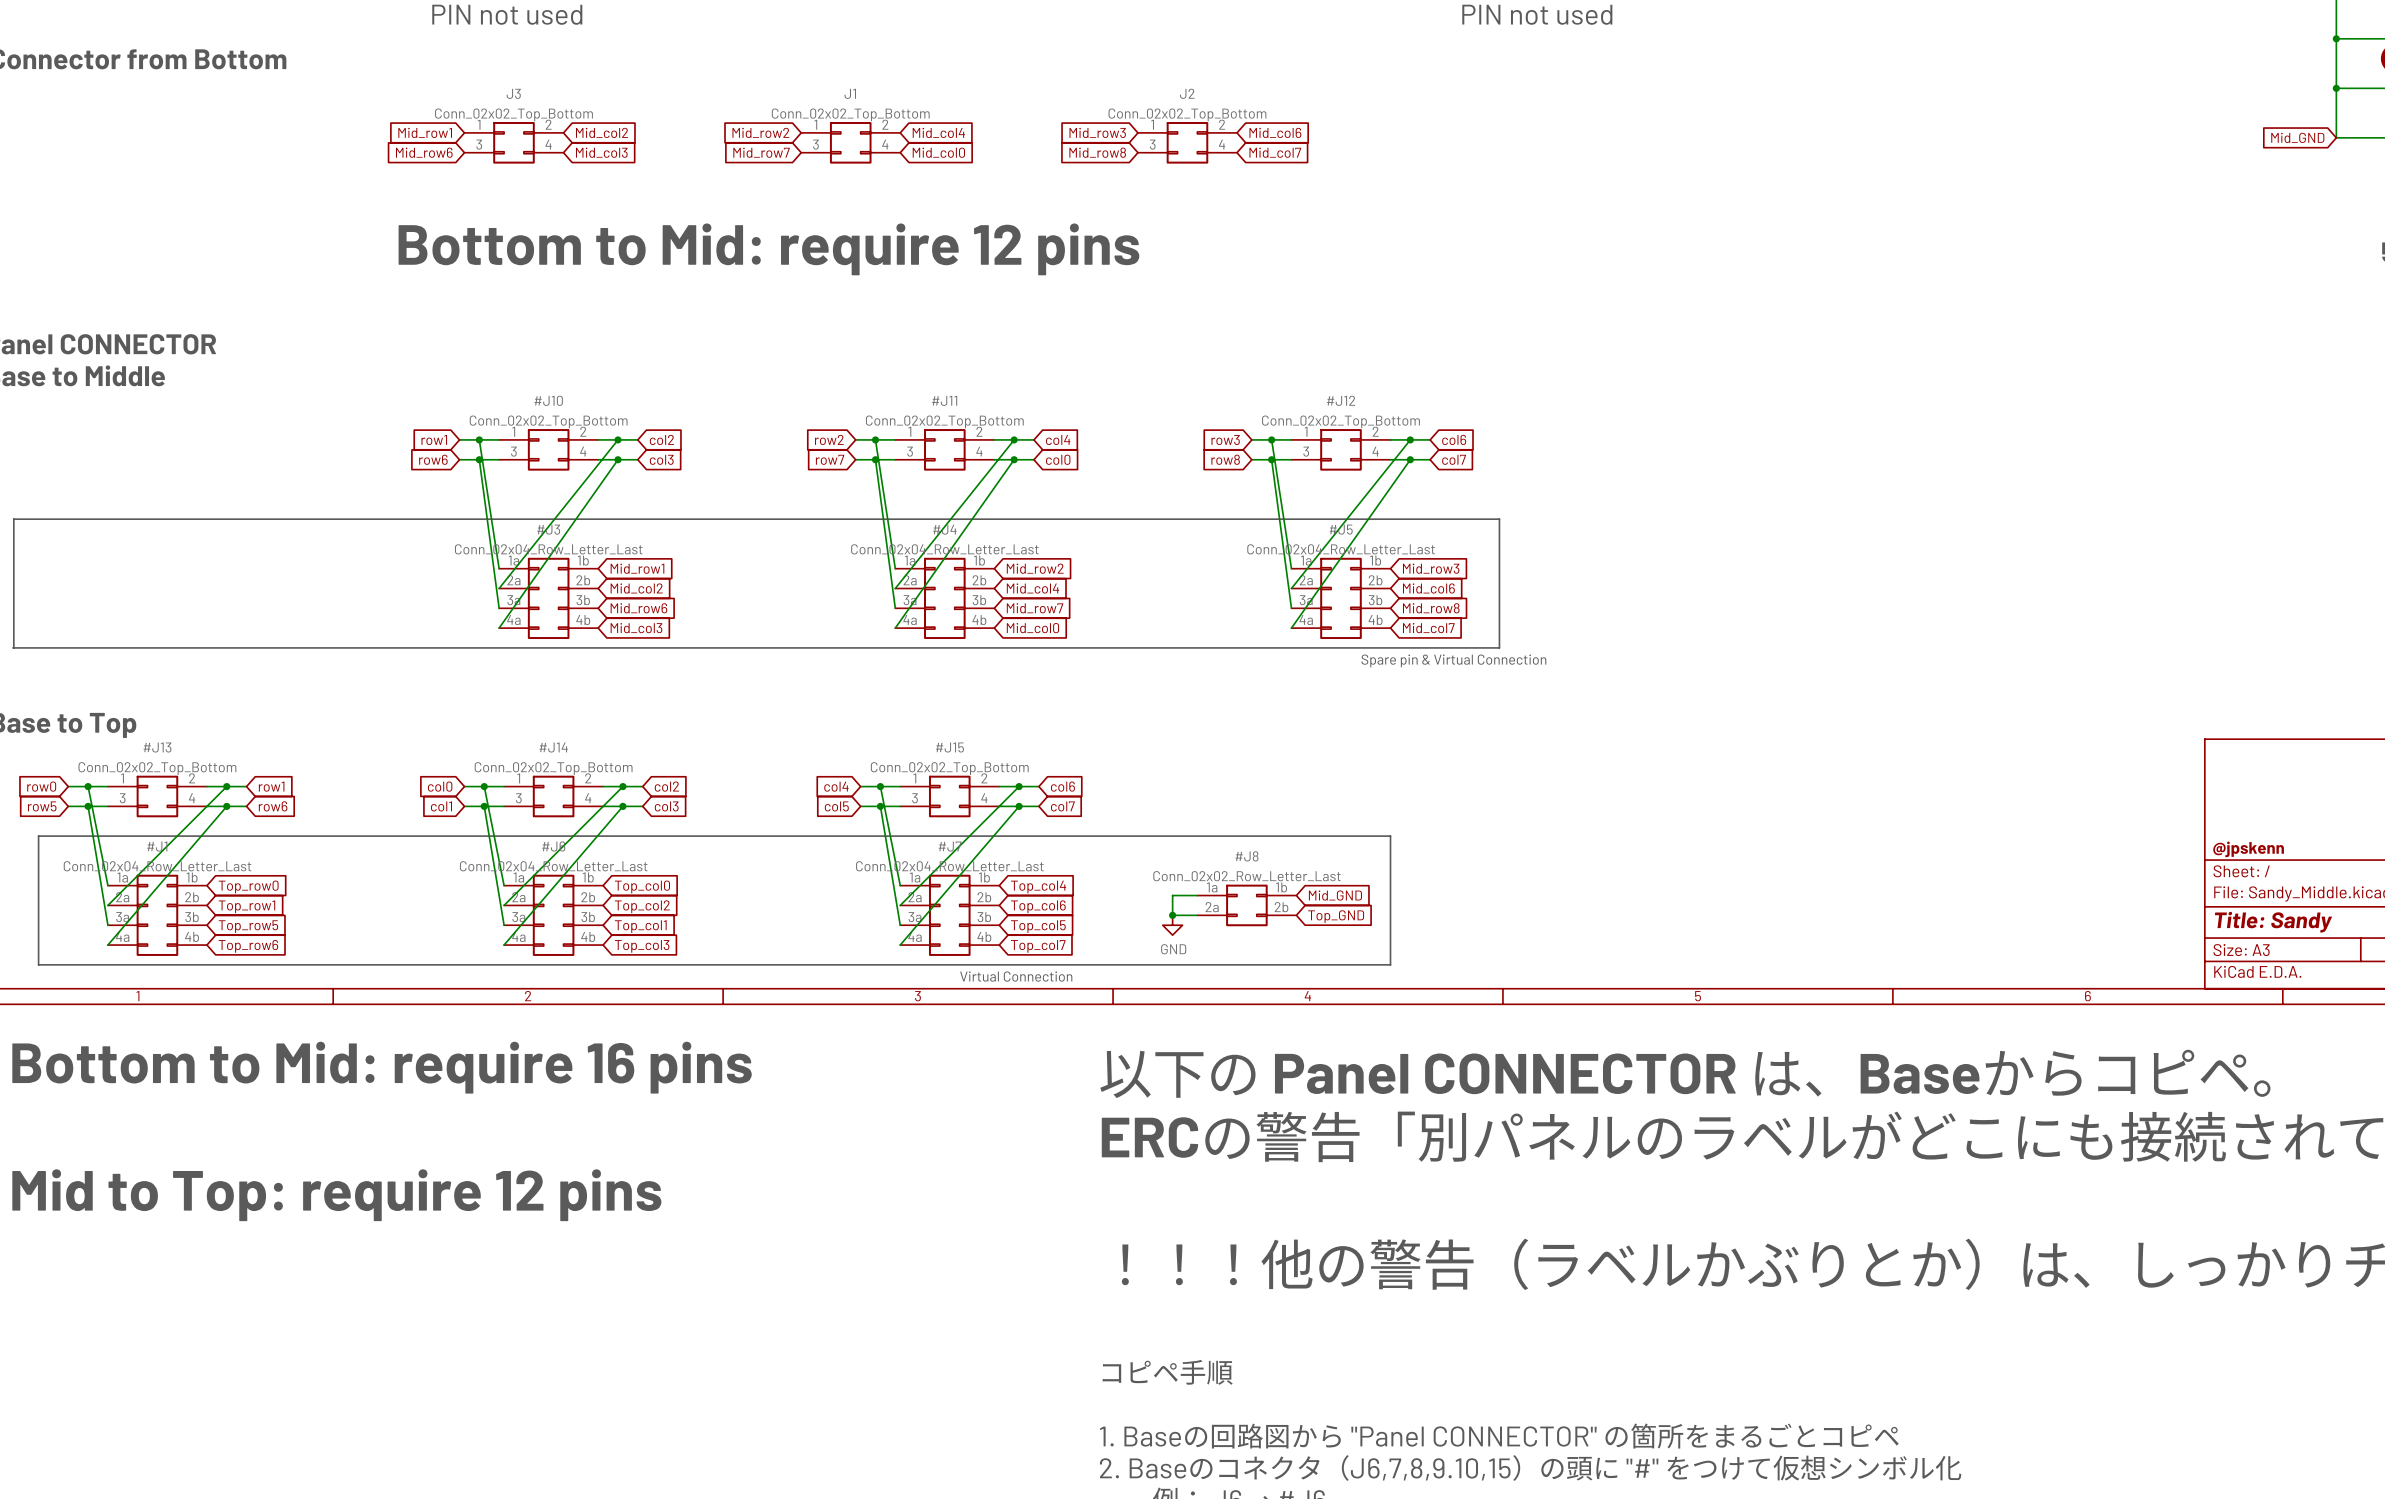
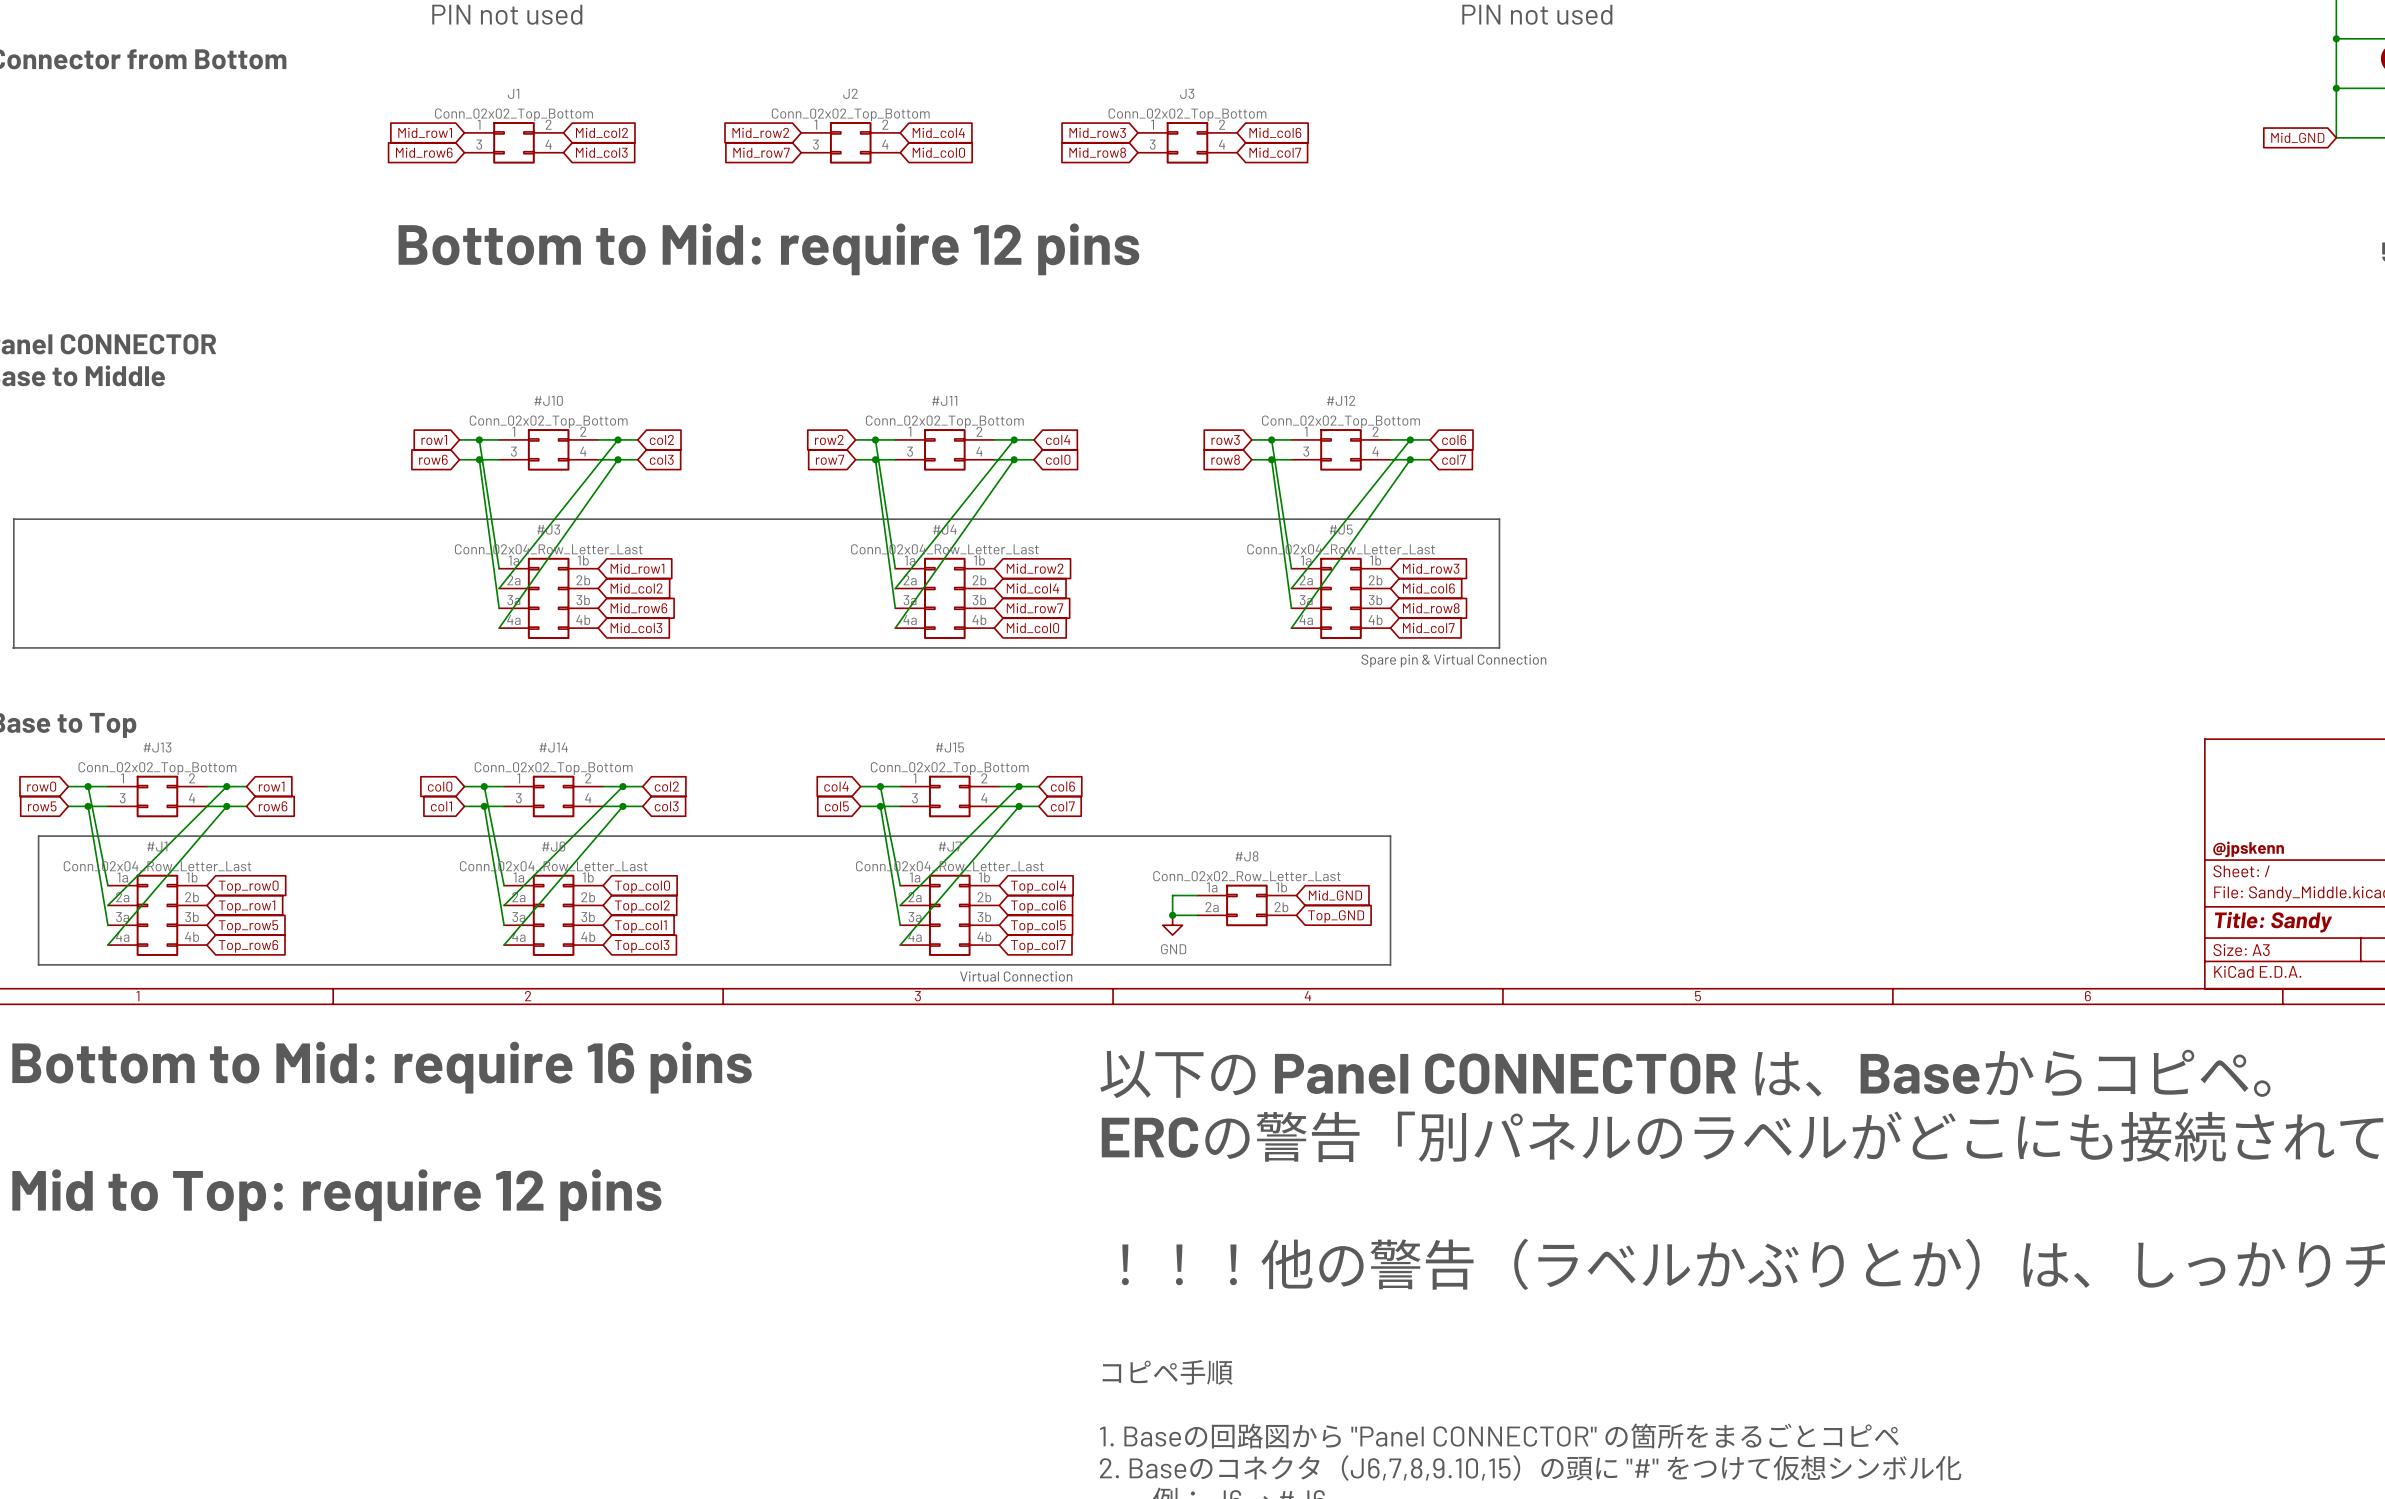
J3 name: J3 (513, 93) -> J1 (513, 93)
J1 name: J1 (850, 93) -> J2 (850, 93)
J2 name: J2 (1187, 93) -> J3 (1187, 93)

